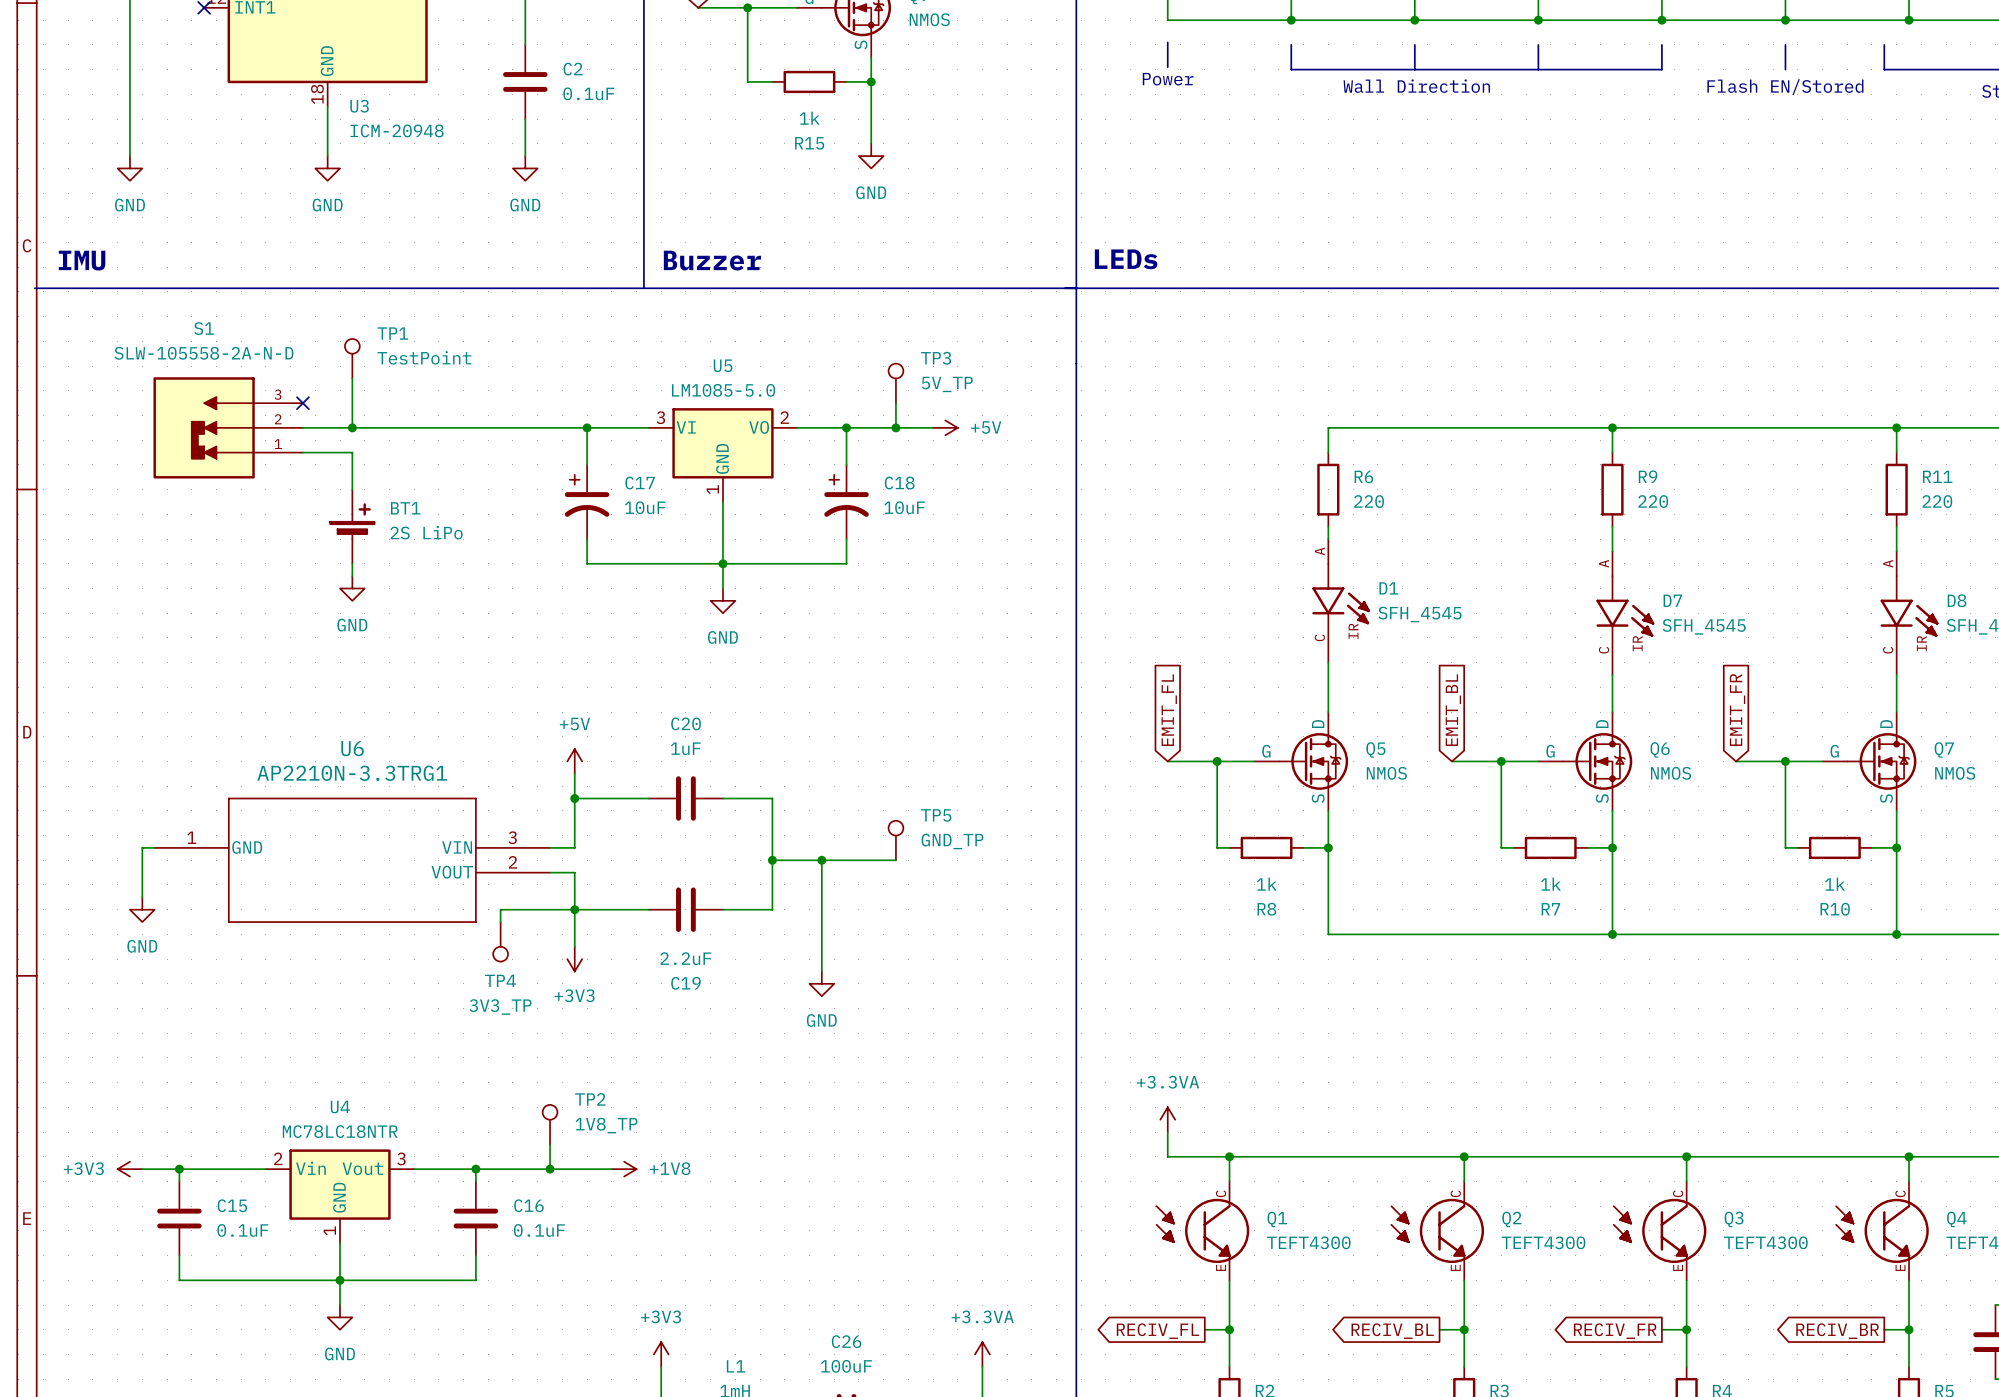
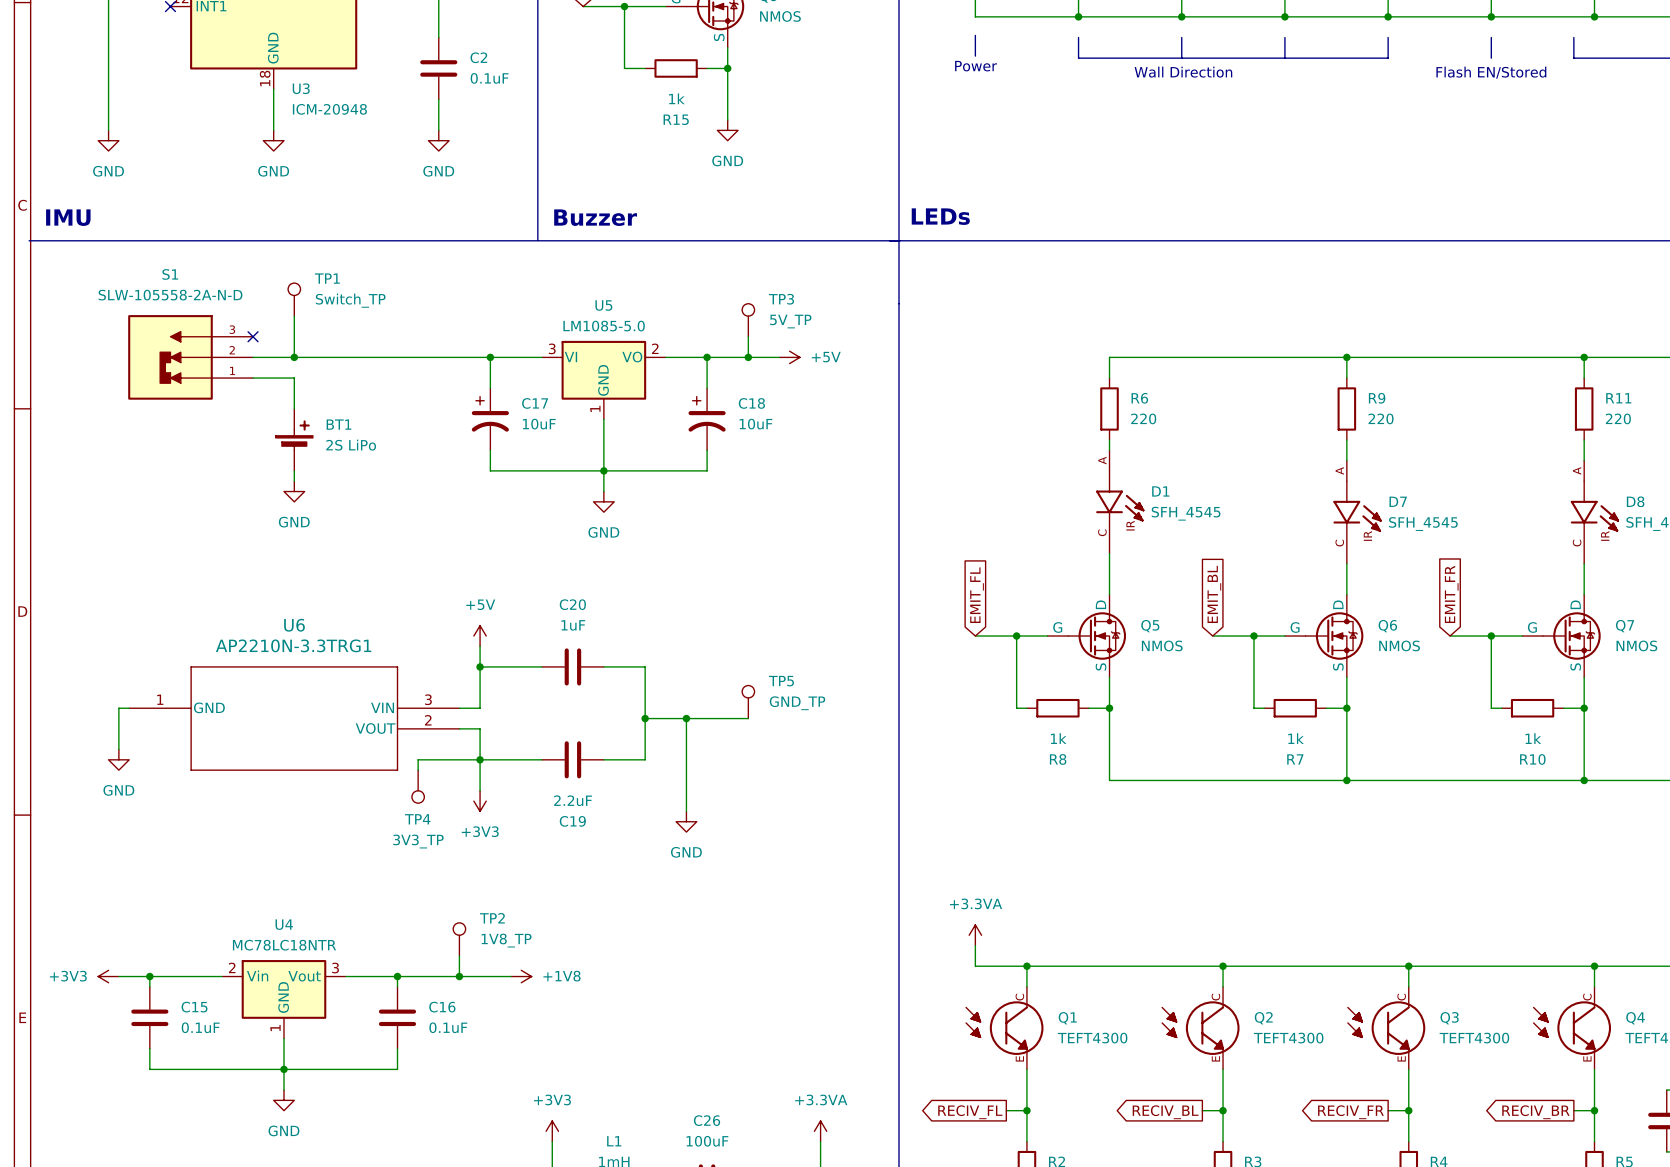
TP1 value: TestPoint (424, 357) -> Switch_TP (350, 300)

